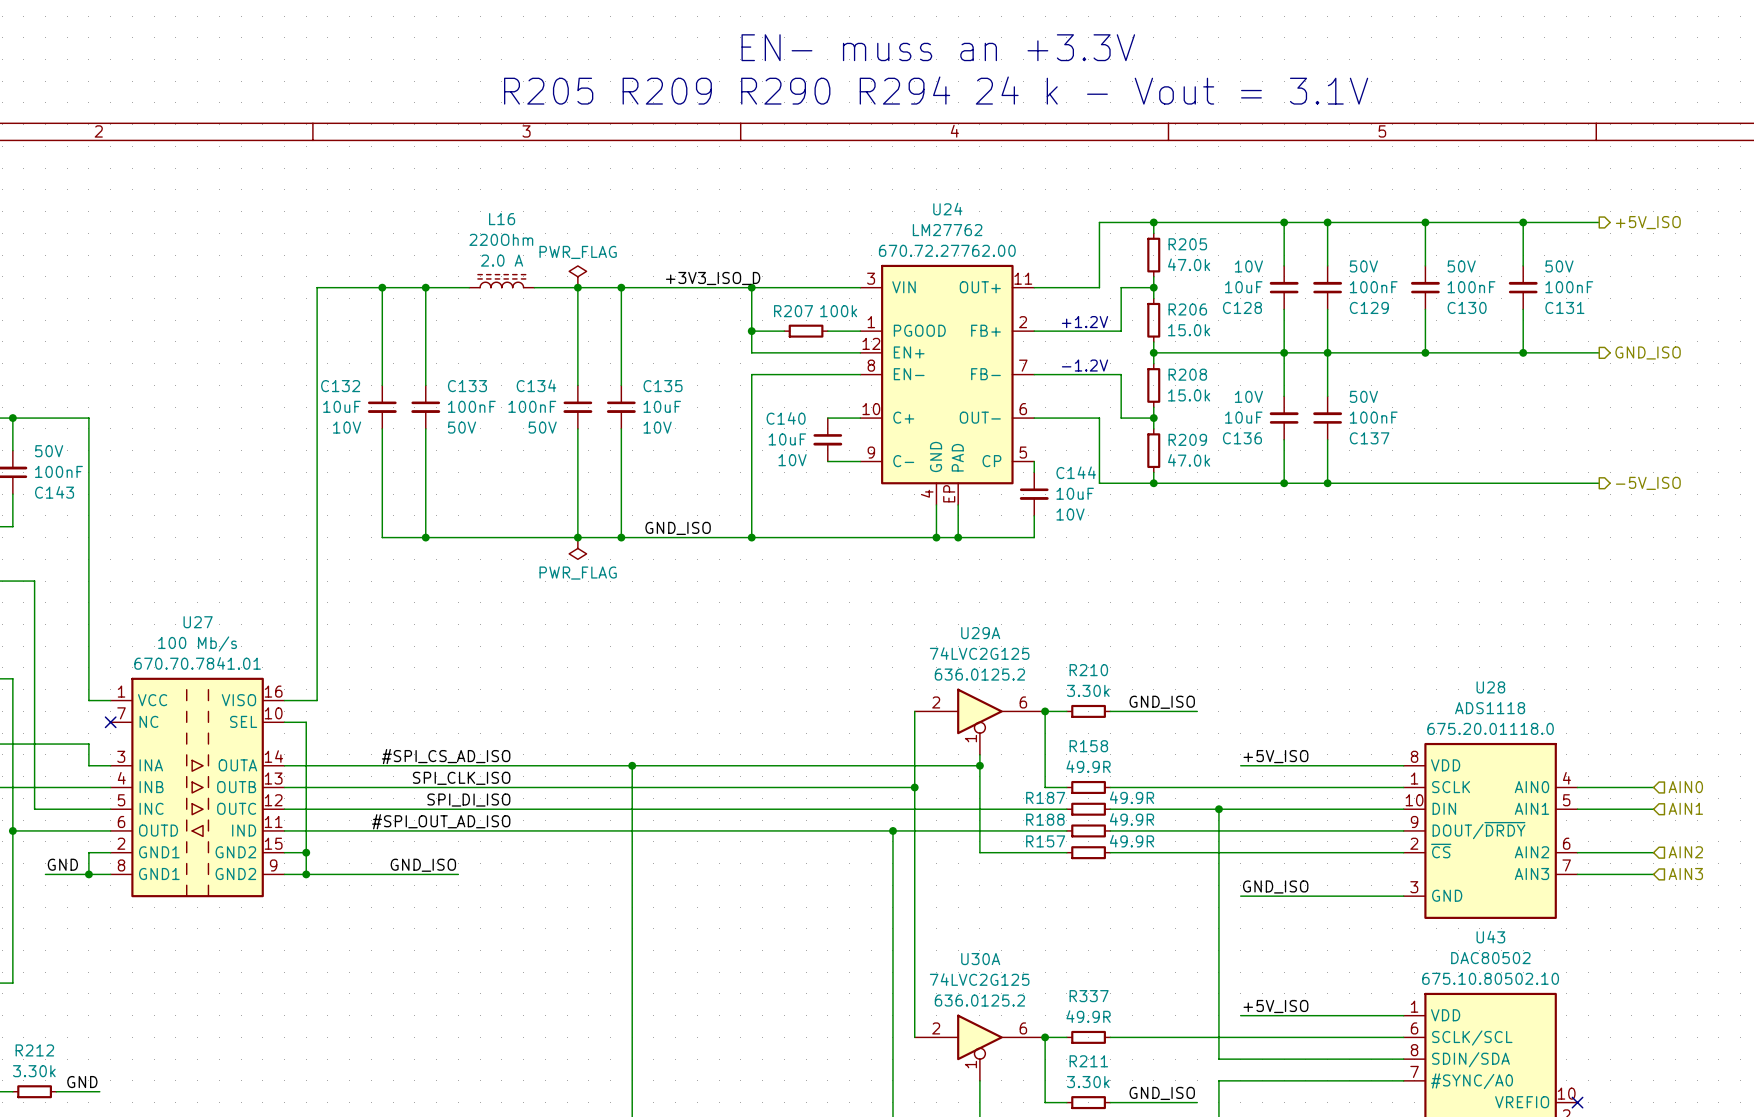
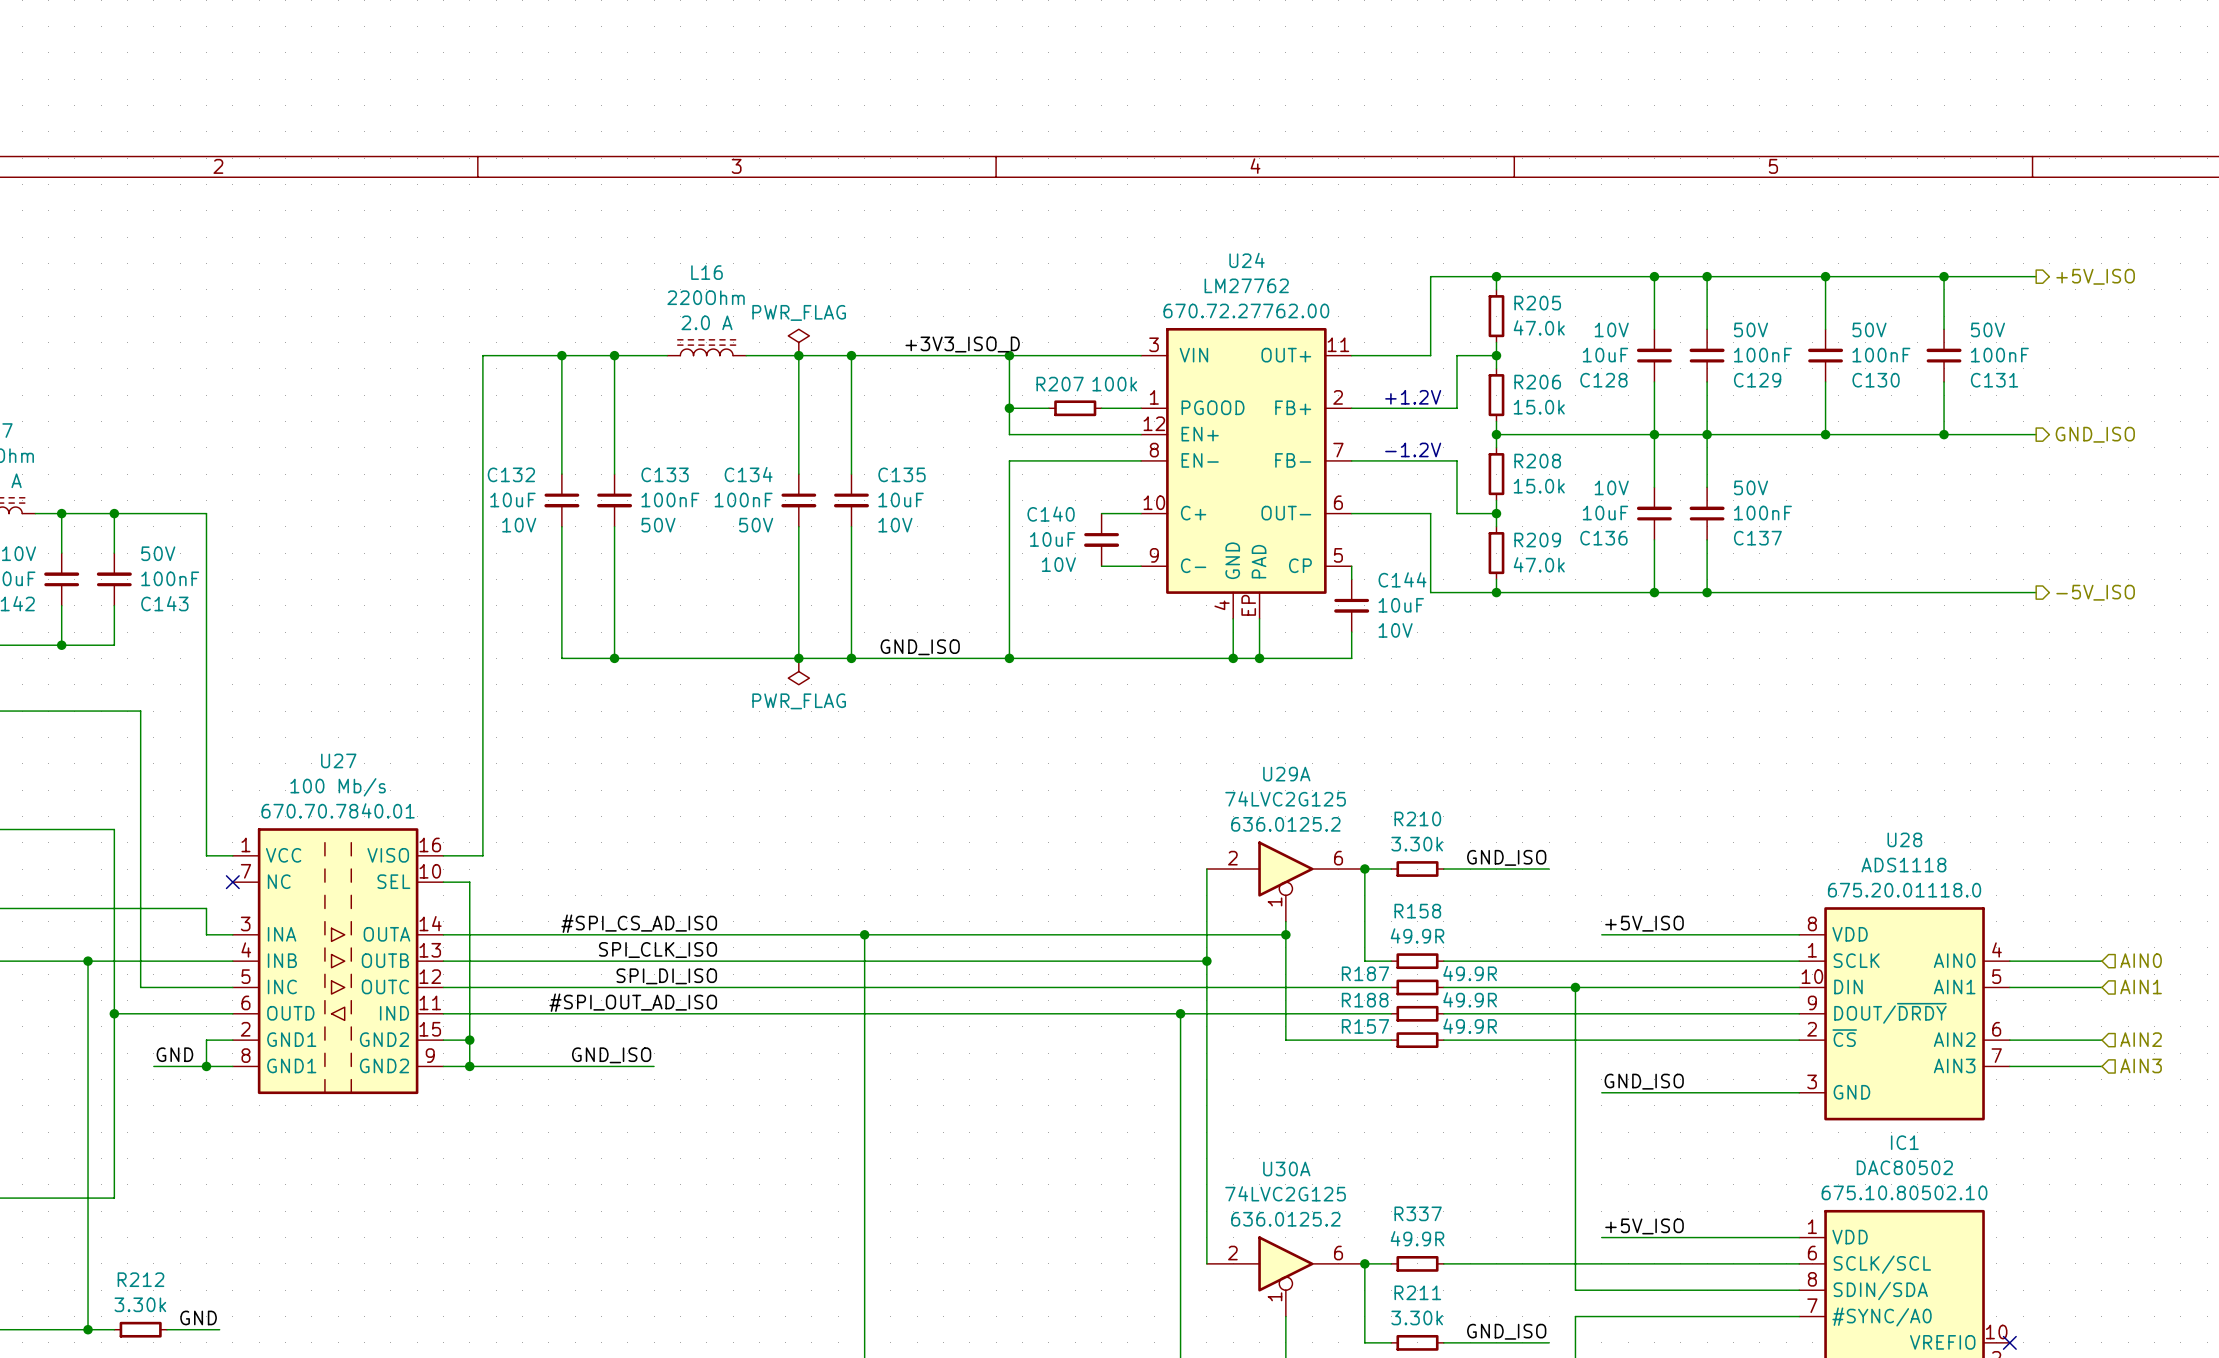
text: EN- muss an +3.3V (938, 47) -> none
text: R205 R209 R290 R294 24 k - Vout = 3.1V (936, 90) -> none
U27 text: 670.70.7841.01 (197, 663) -> 670.70.7840.01 (338, 810)
U43 name: U43 (1490, 937) -> IC1 (1904, 1142)

